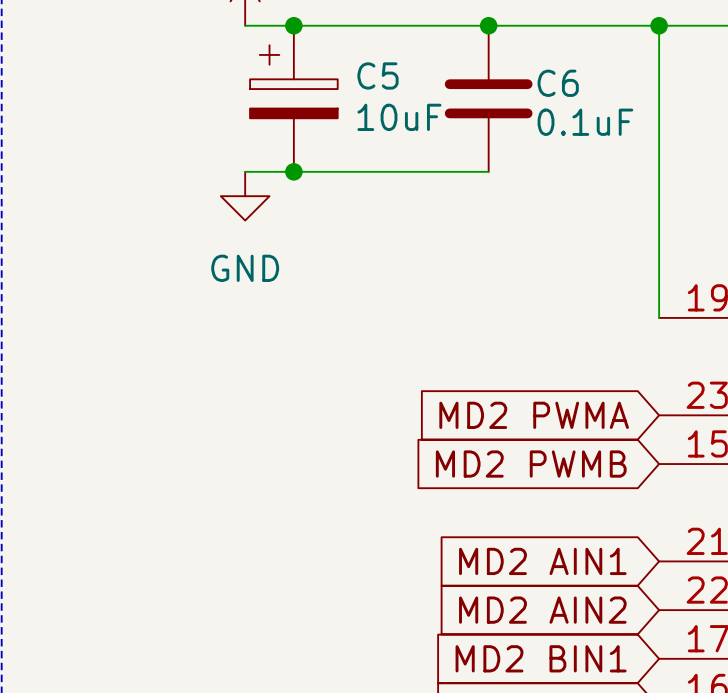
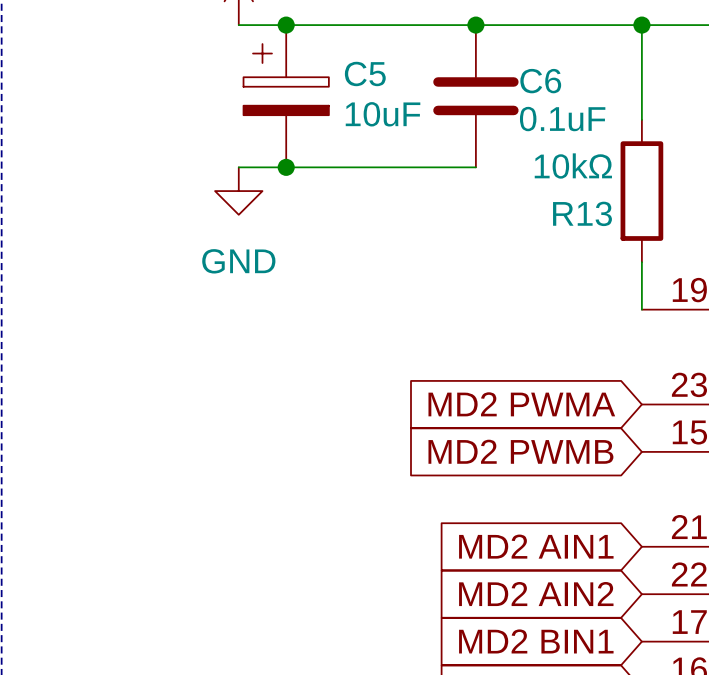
wire: (659, 123) (659, 269) -> none
R13: none -> 10kΩ (641, 191)

